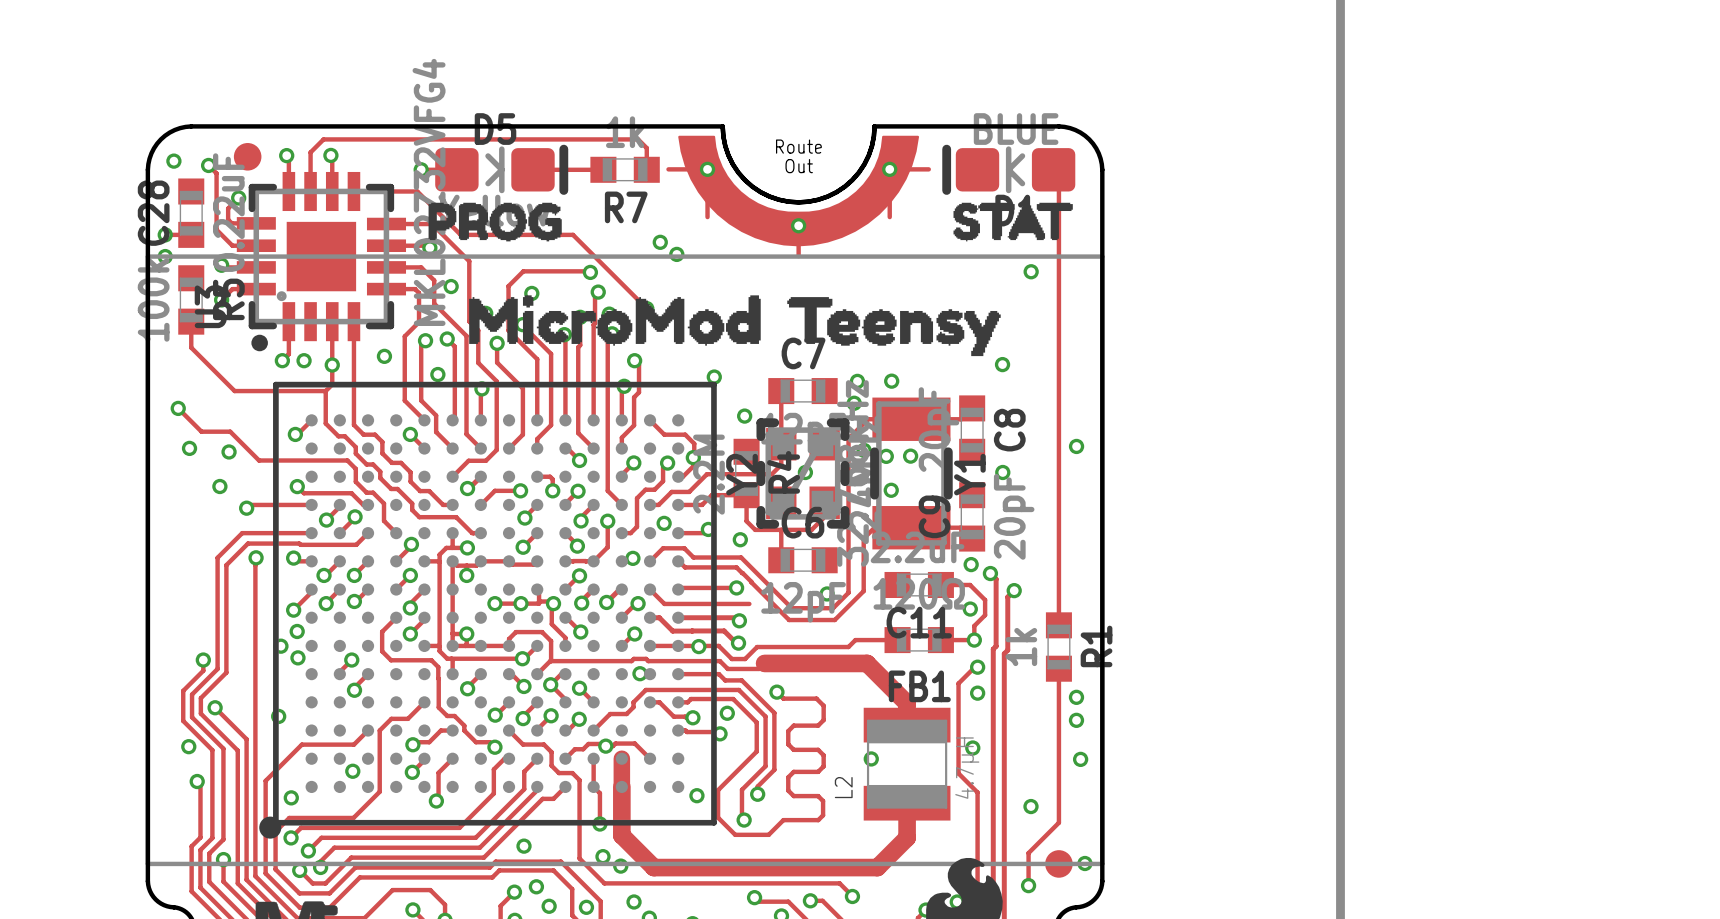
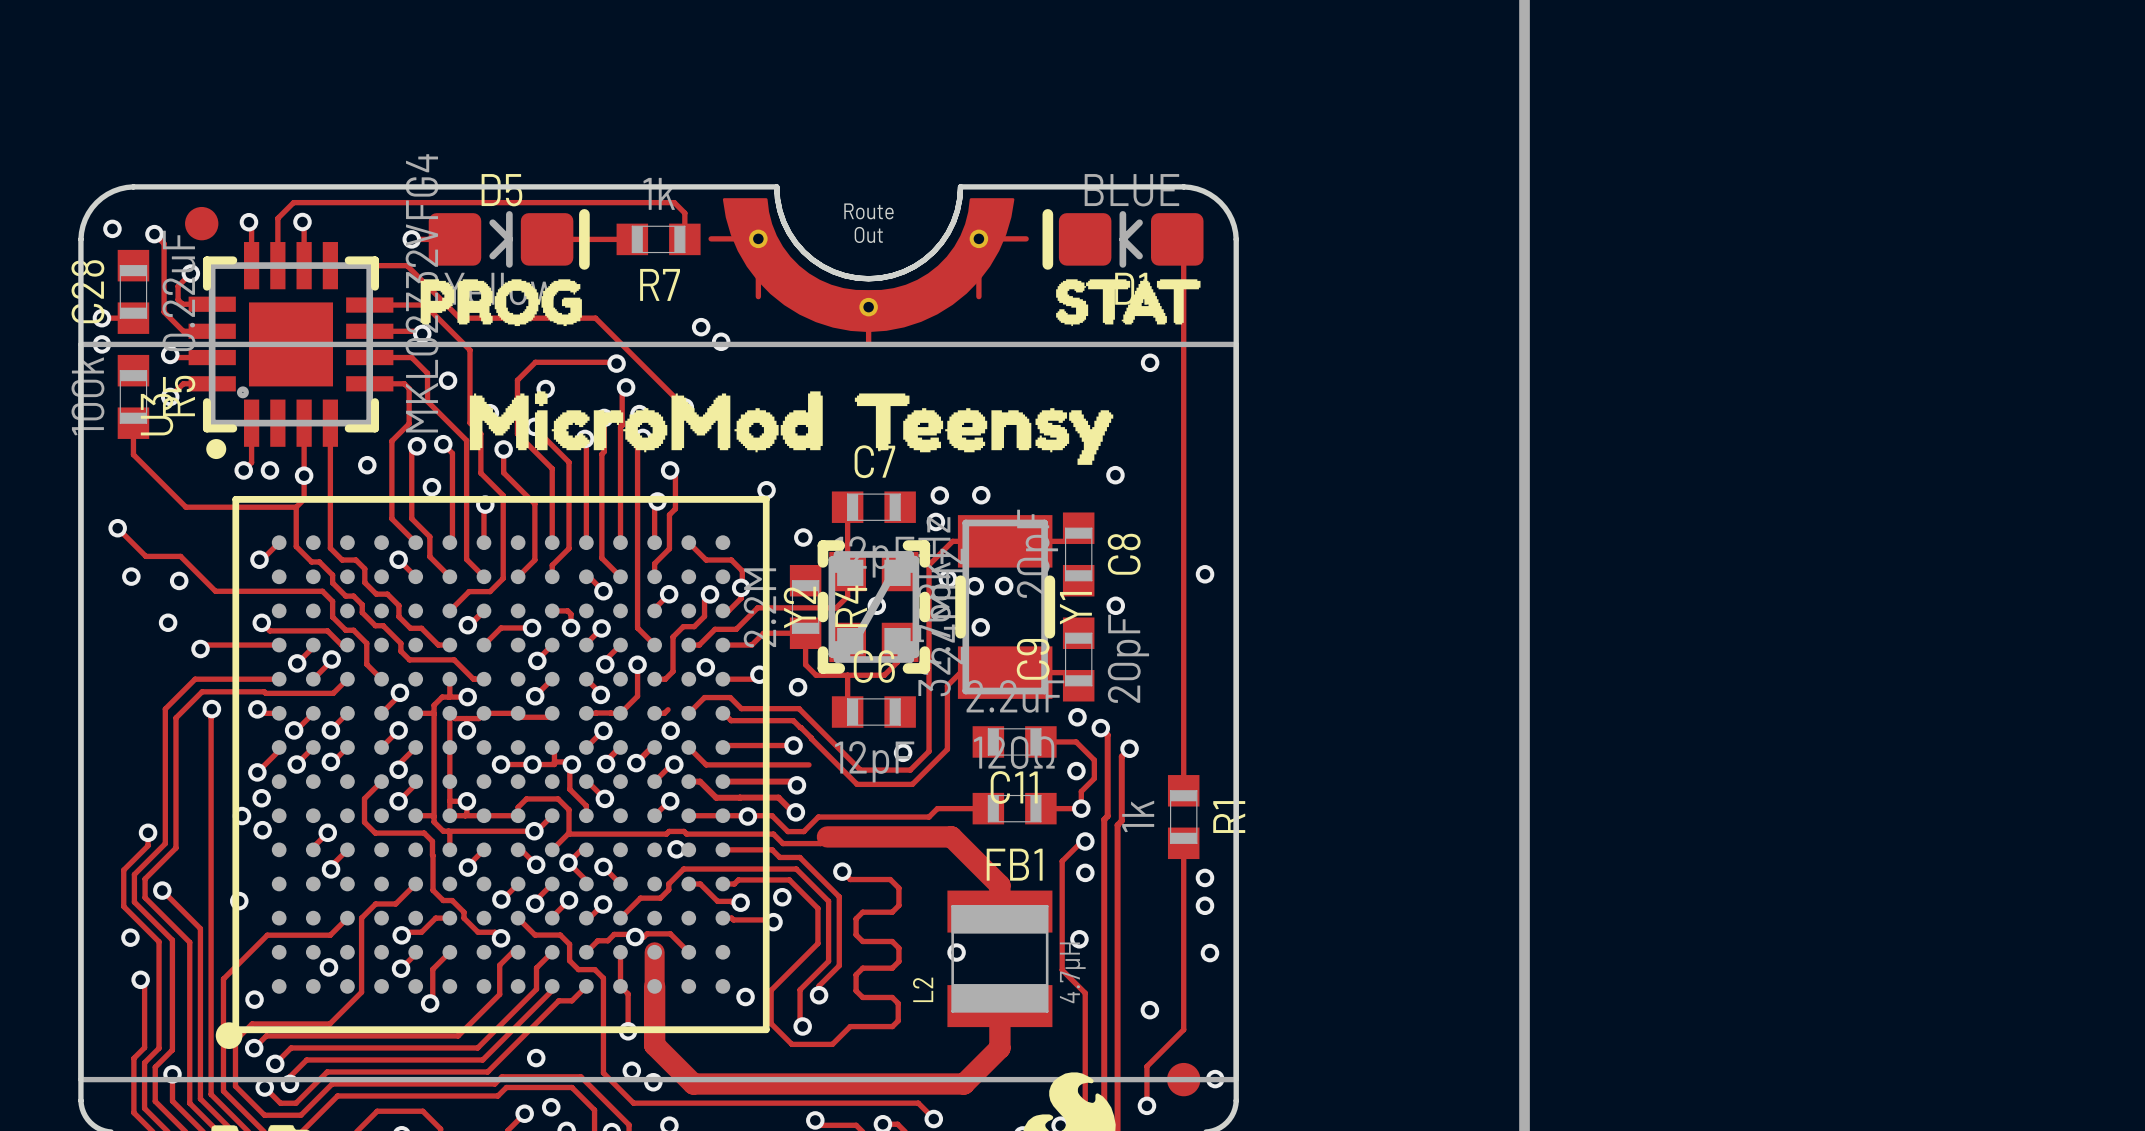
via position: (632, 558) -> (670, 730)

